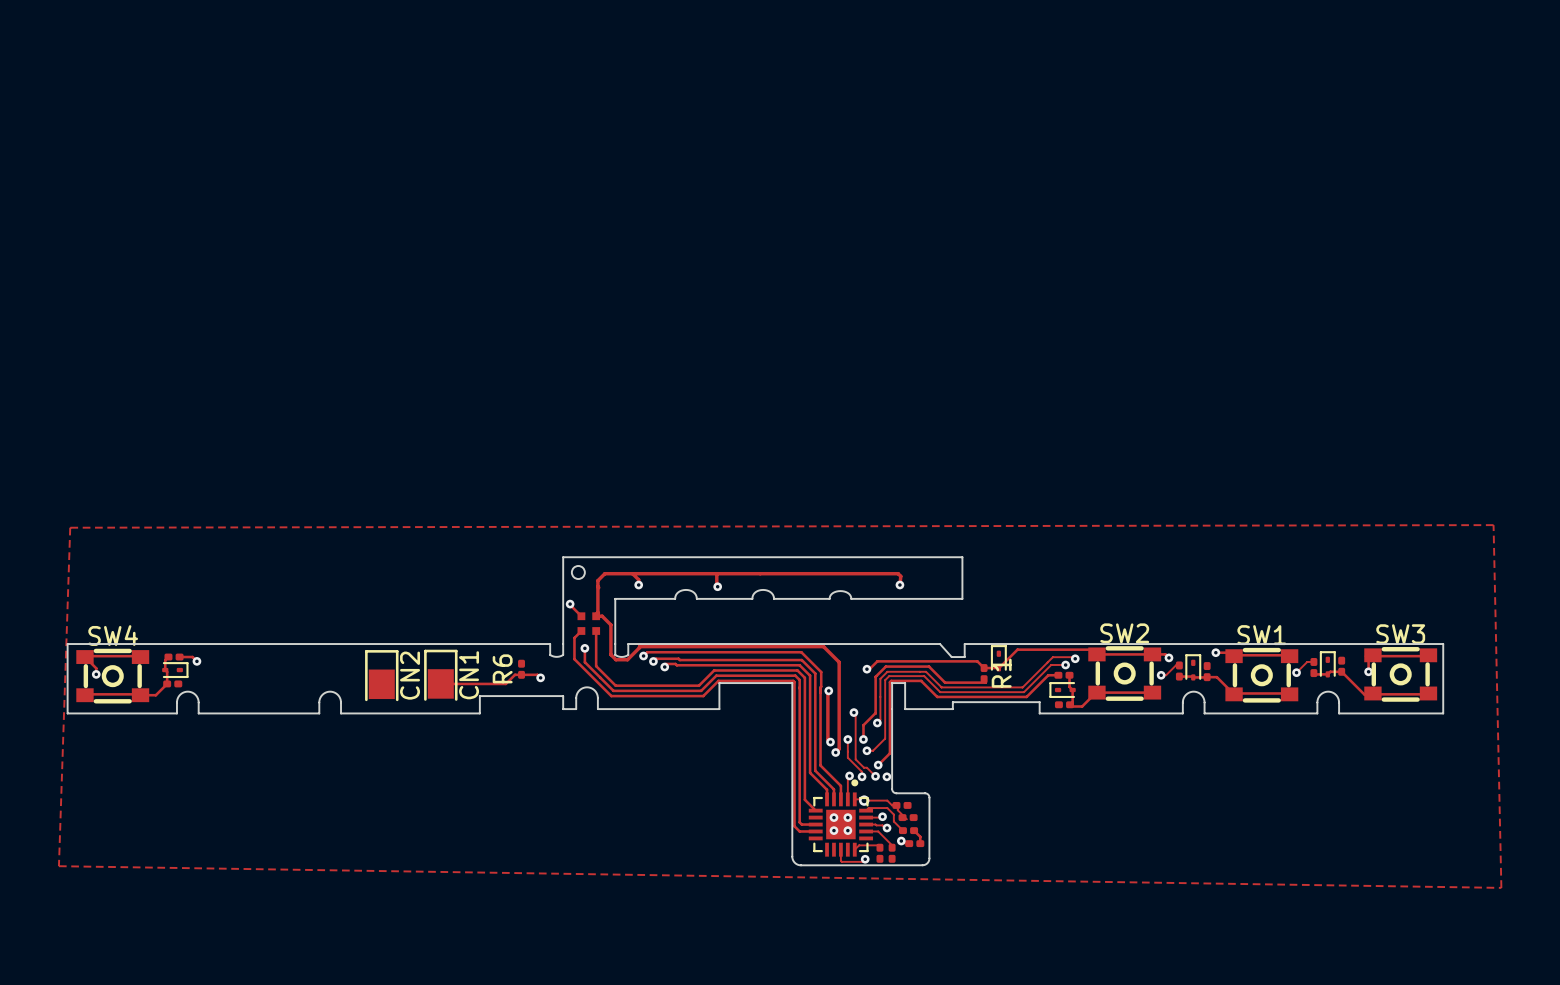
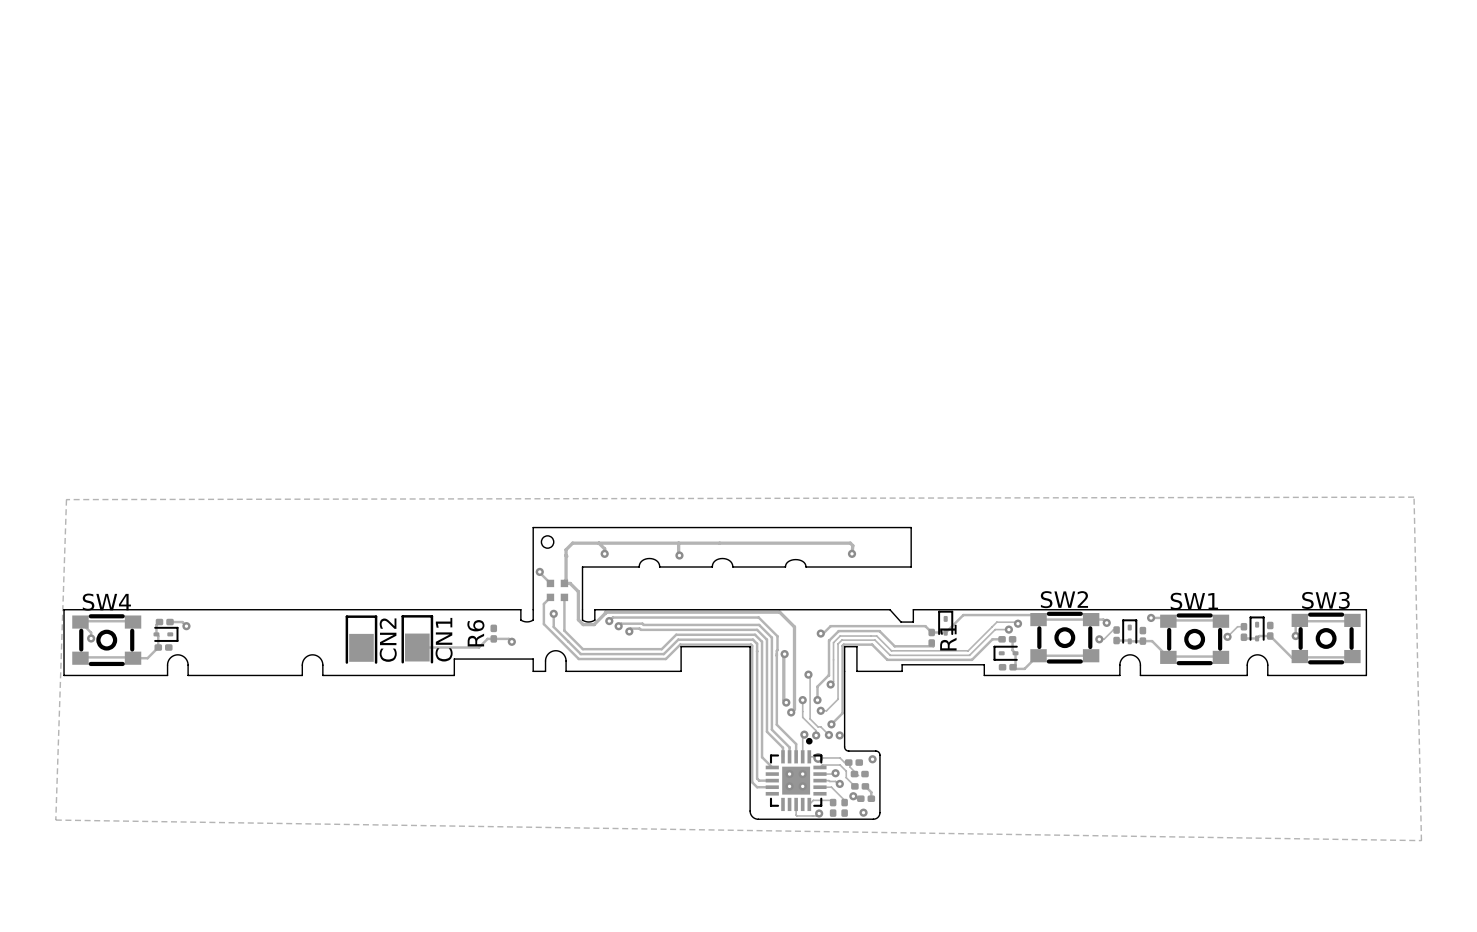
via: none -> (872, 759)
via: none -> (863, 812)

